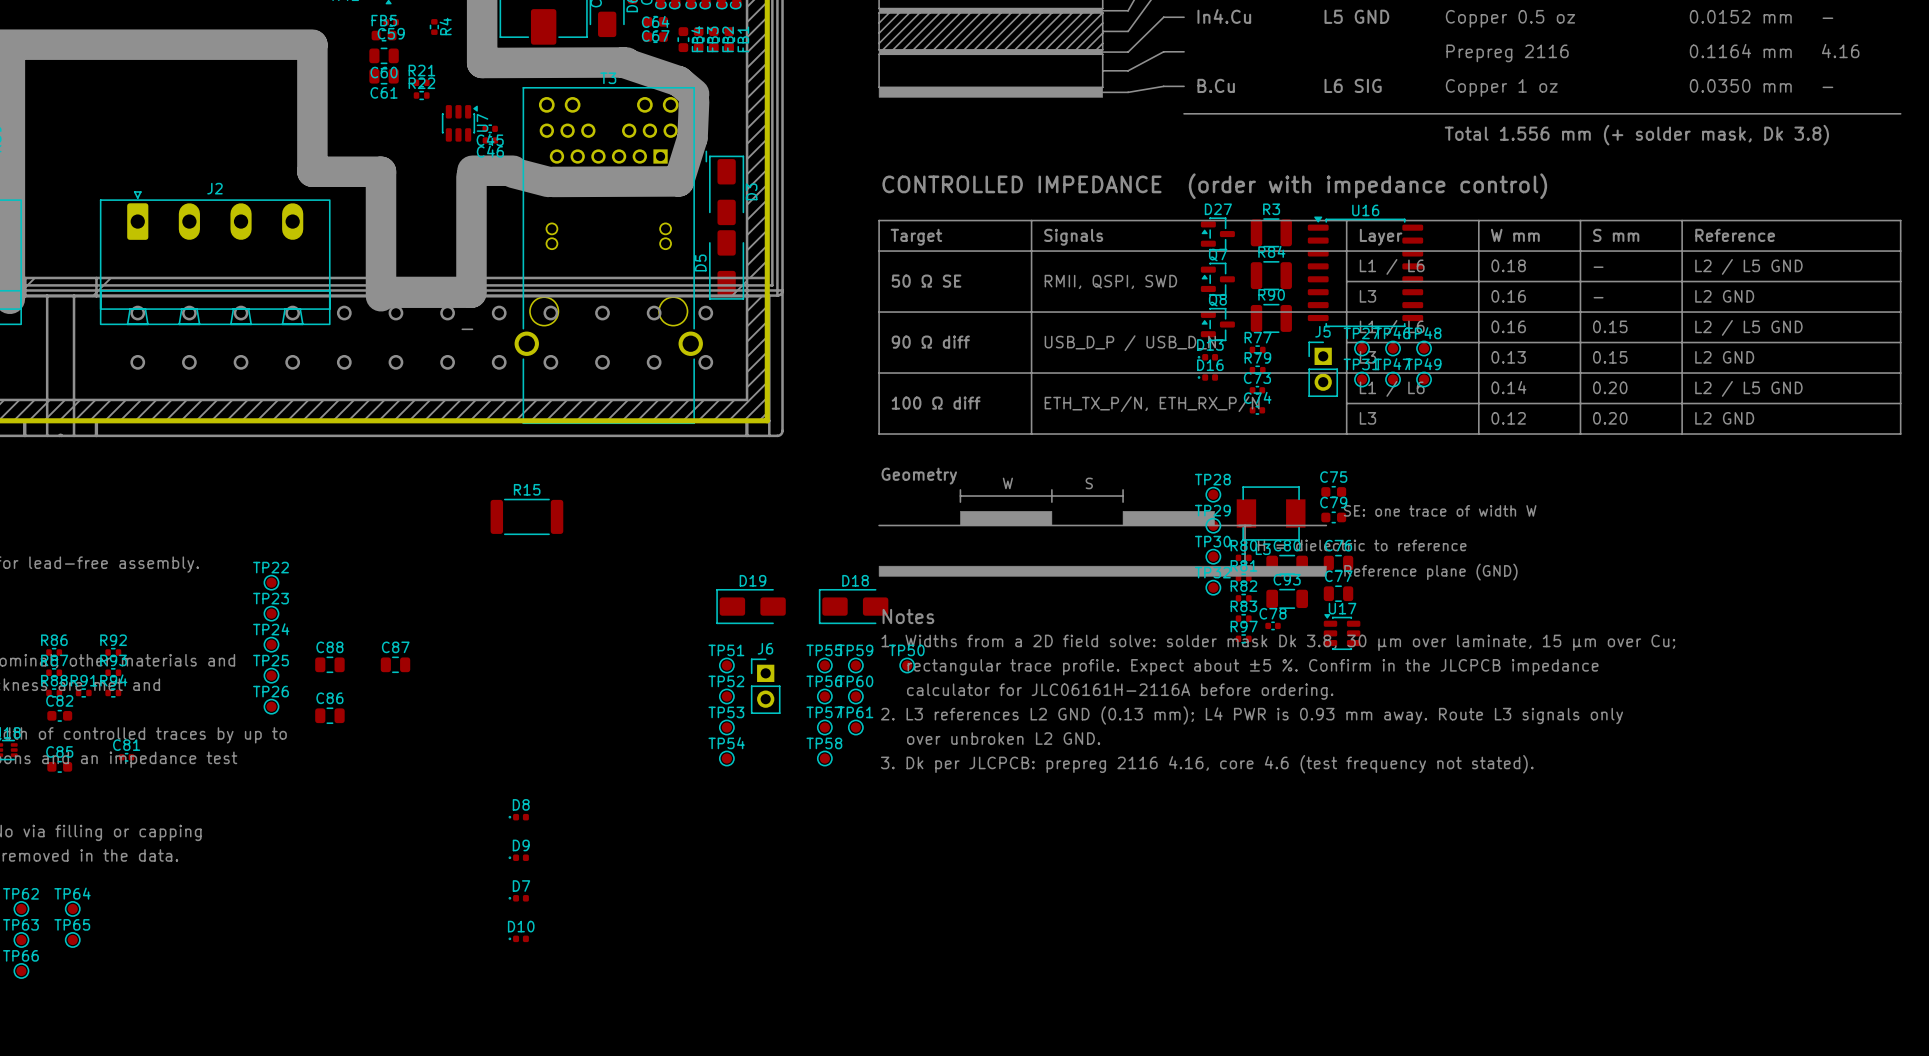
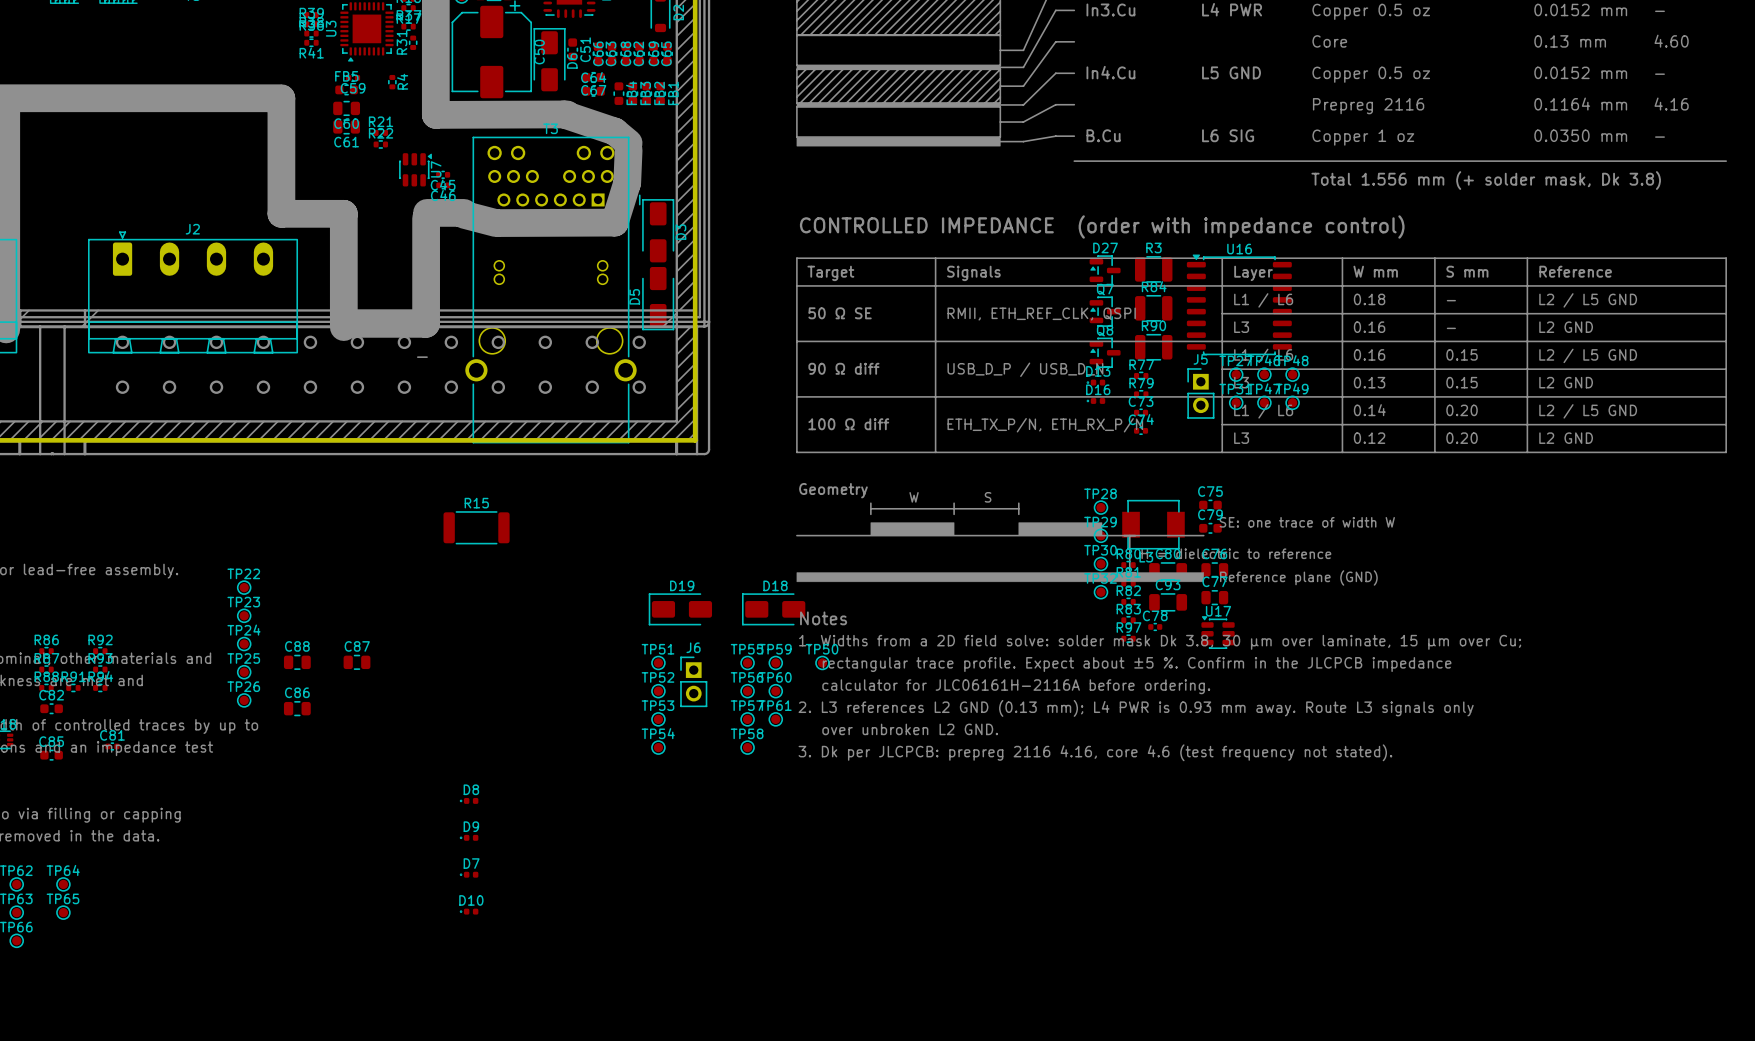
text: RMII, QSPI, SWD (1110, 281) -> RMII, ETH_REF_CLK, QSPI (1041, 314)

